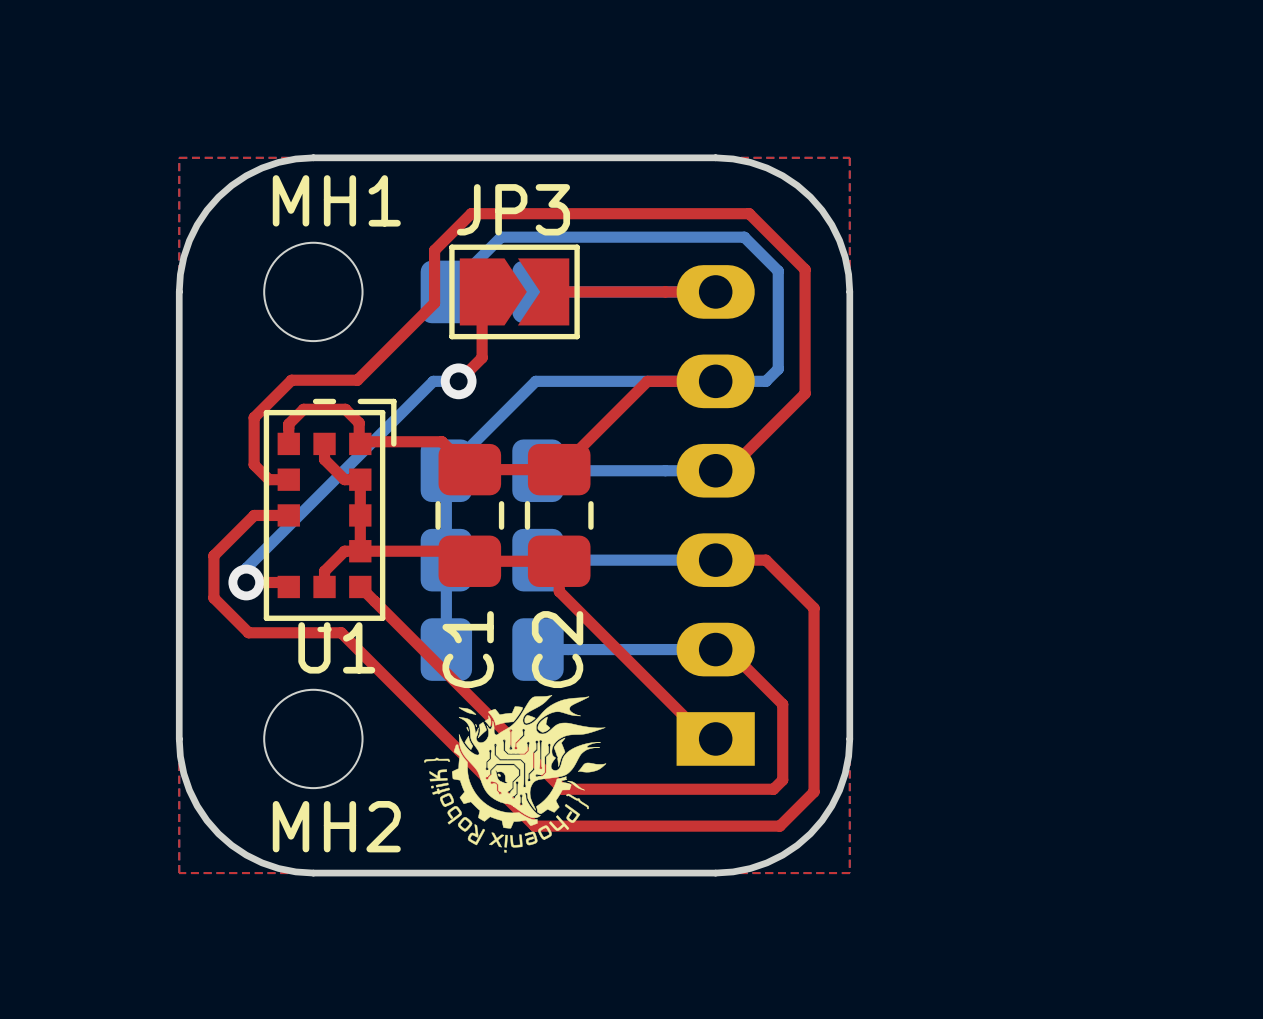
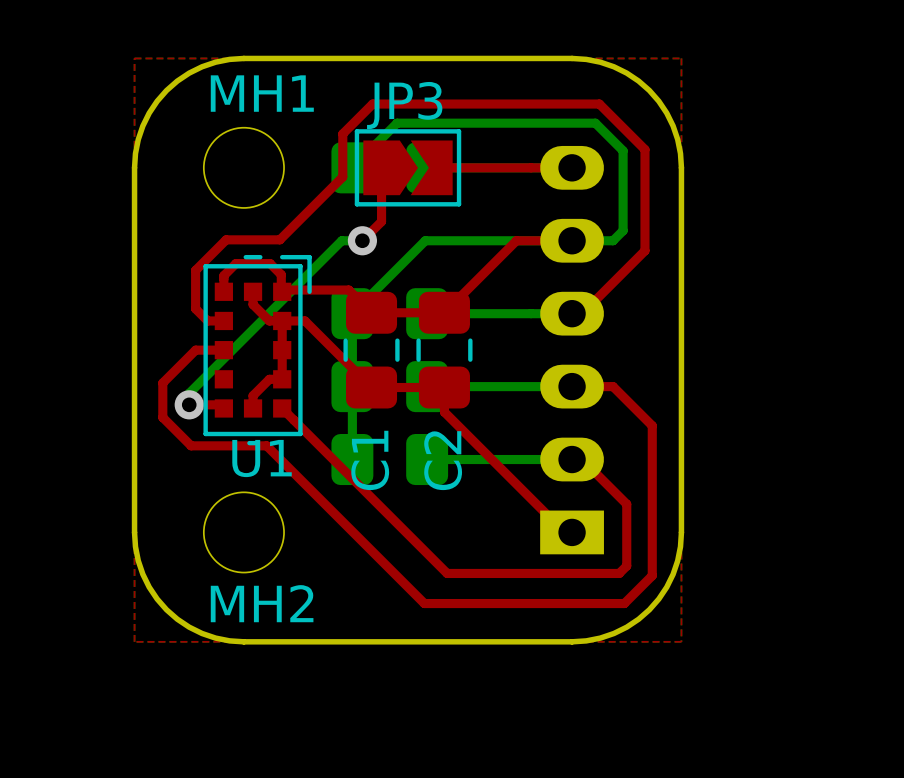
U1 footprint: [263, 398, 397, 633] -> [203, 254, 312, 446]
top track: (360, 551) (459, 551) -> (282, 320) (304, 320) (363, 379)
drawing: [424, 695, 607, 853] -> none

